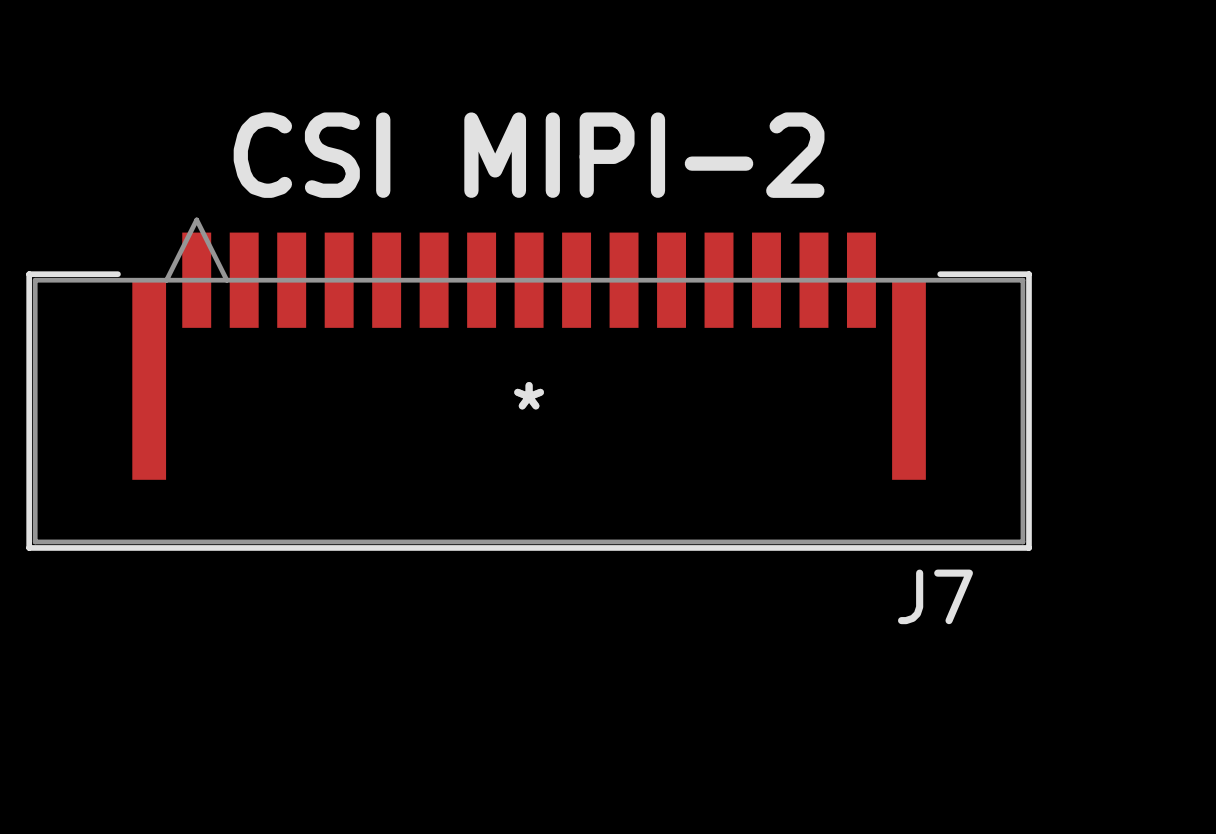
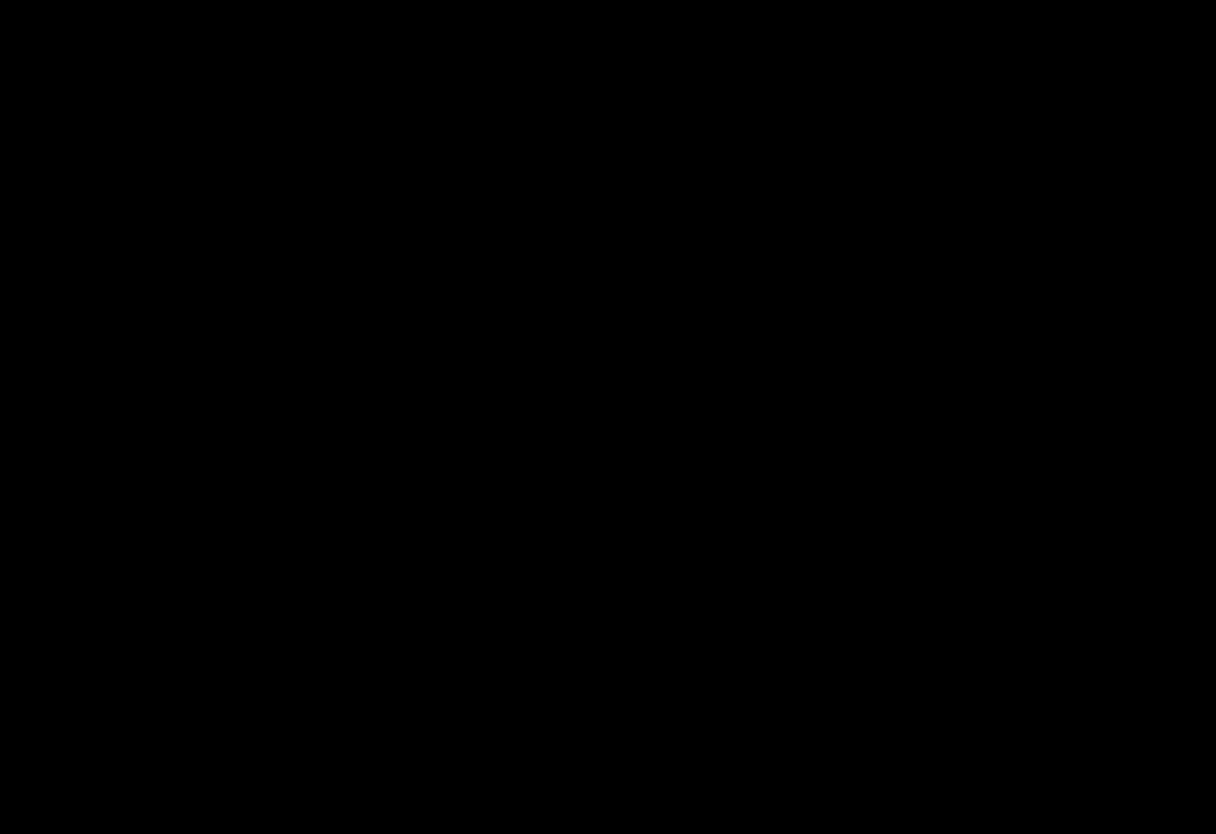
text: CSI MIPI-2 (529, 155) -> none
J7: (529, 384) -> none

